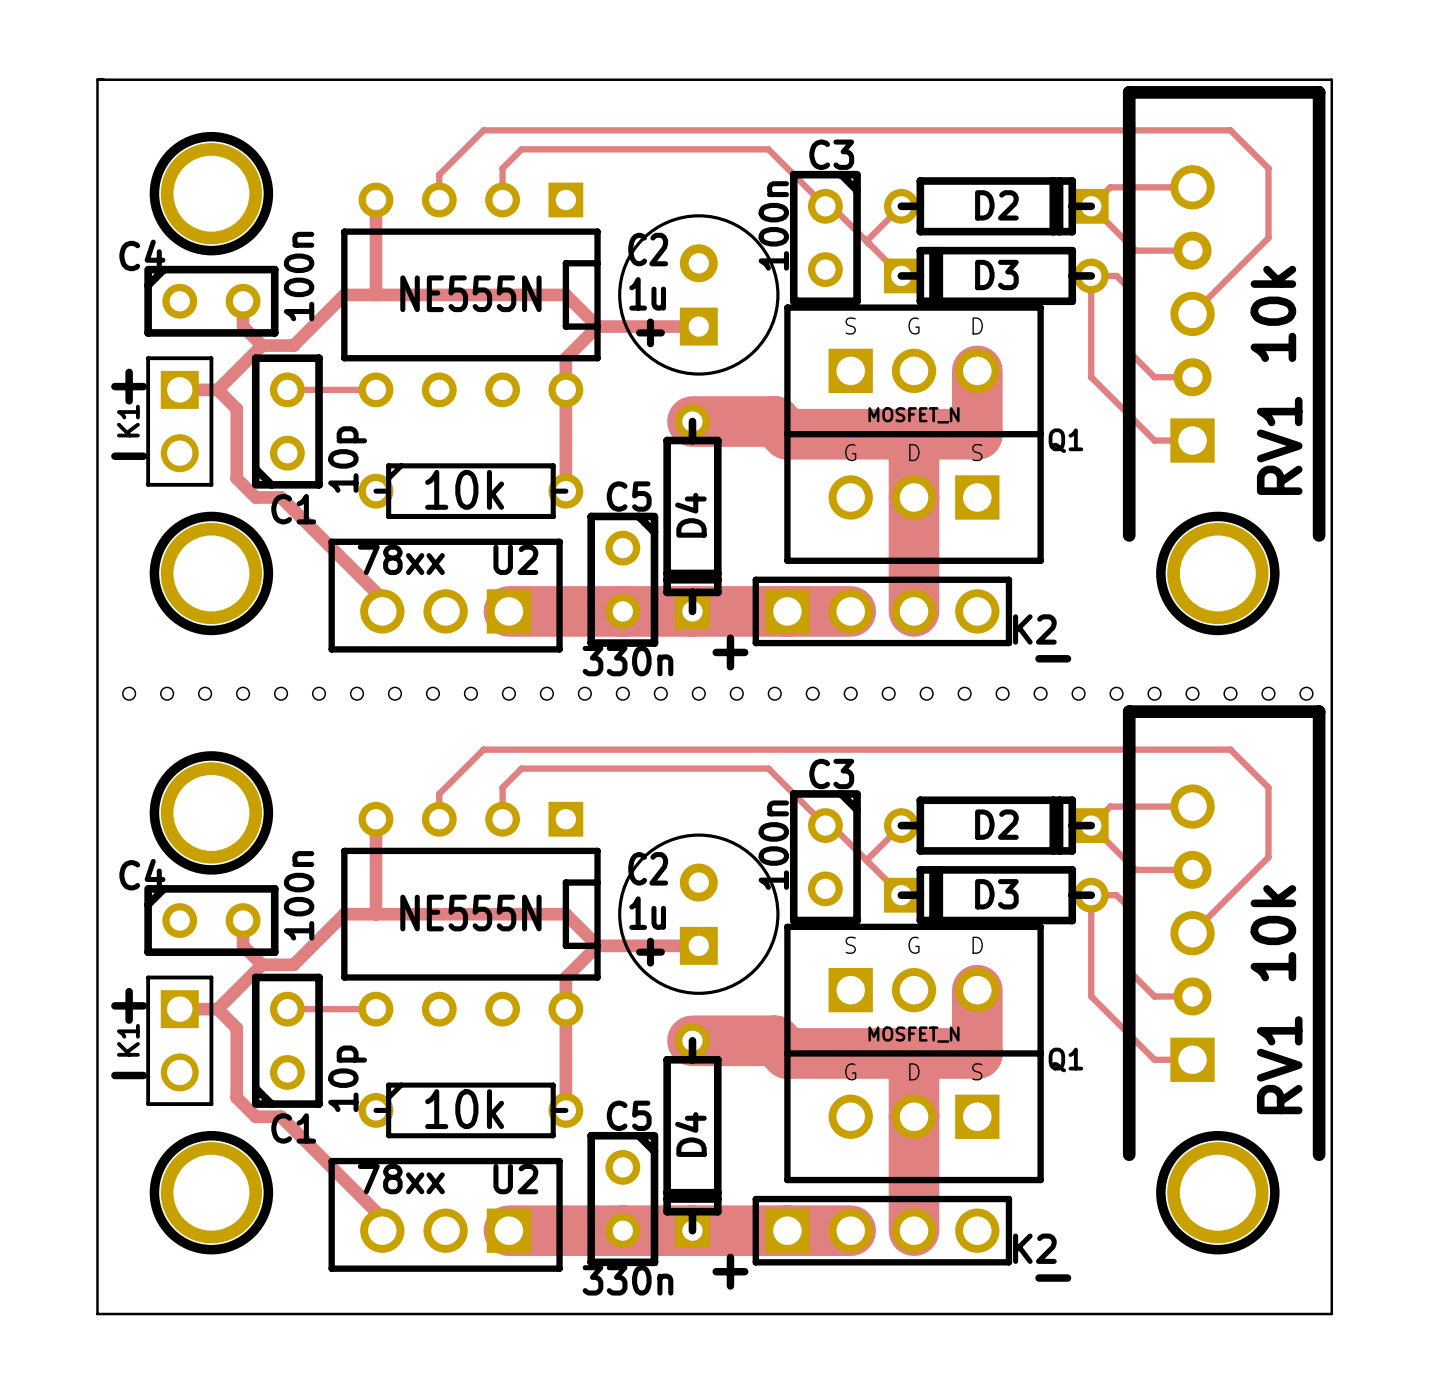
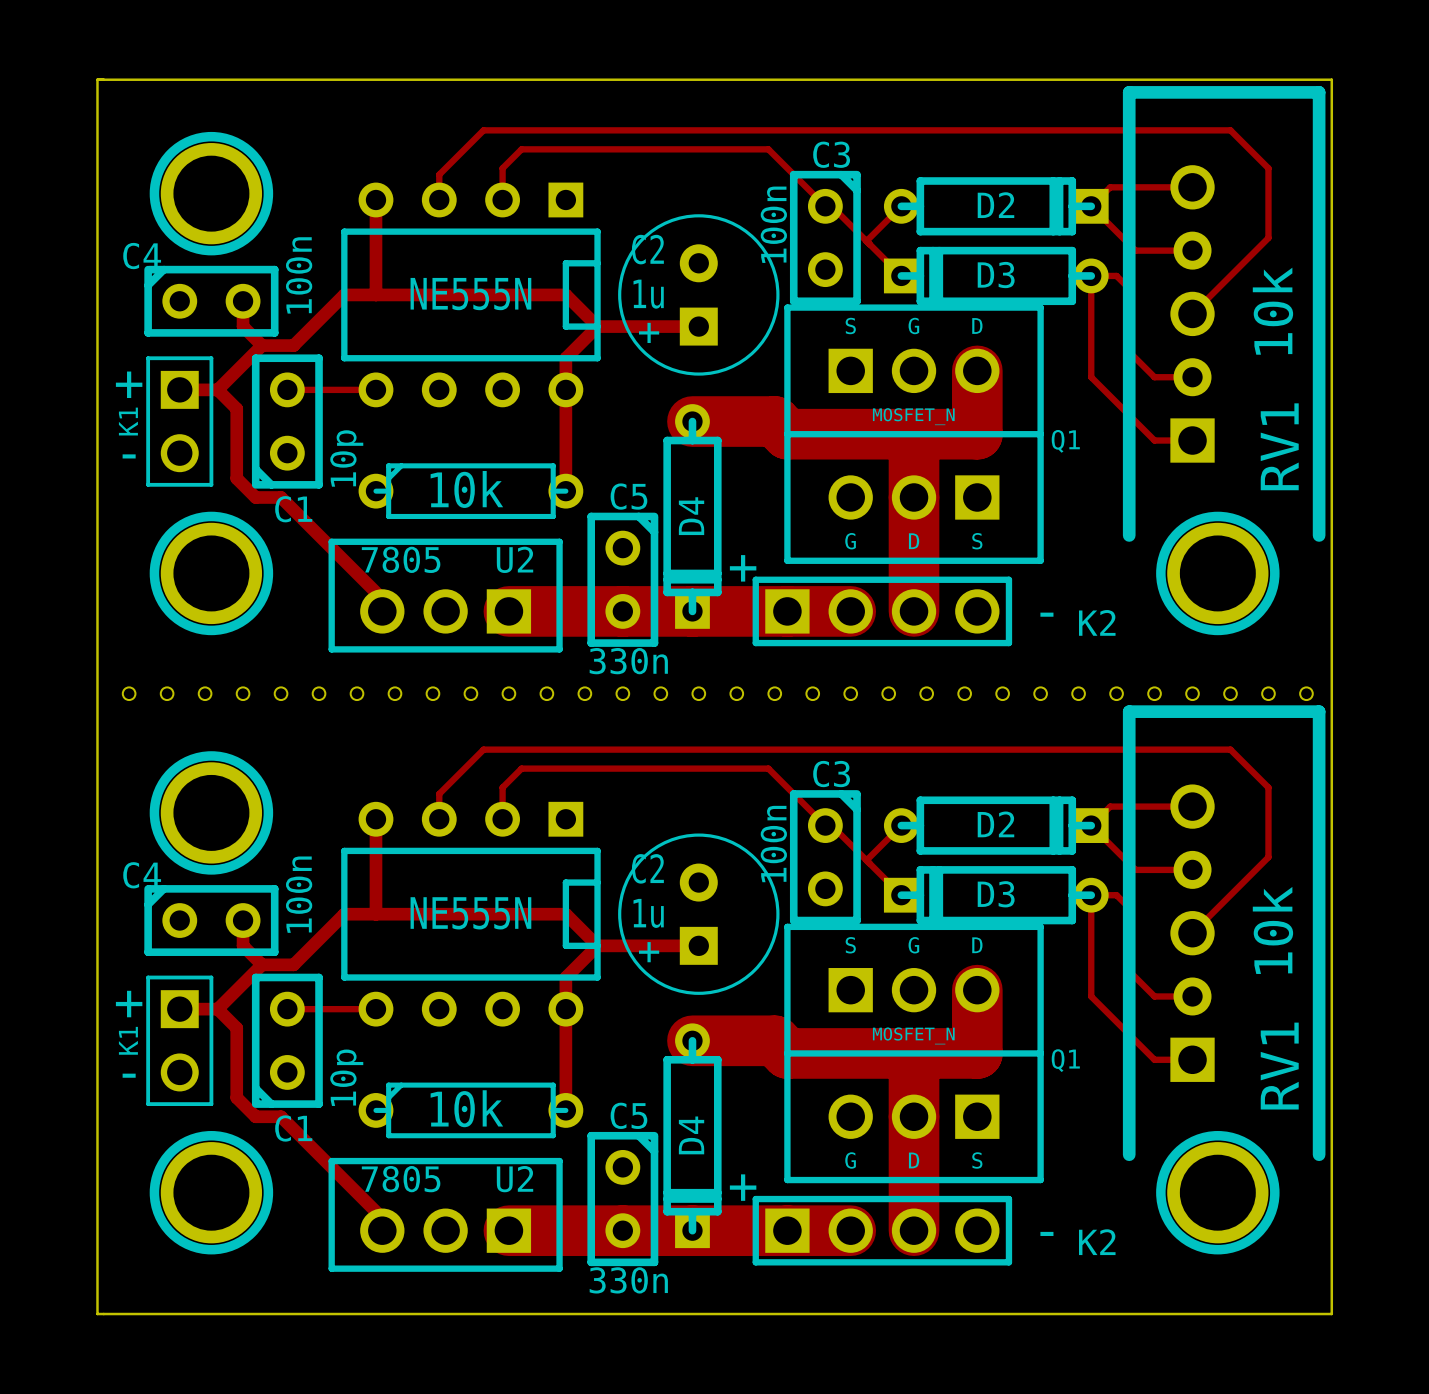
Q1 text position: G (850, 452) -> G (850, 541)
Q1 text position: D (914, 452) -> D (914, 541)
Q1 text position: S (977, 452) -> S (977, 541)
U2 value: 78xx (401, 559) -> 7805 (401, 559)
K2 name position: K2 (1034, 629) -> K2 (1097, 622)
text position: + (730, 652) -> + (743, 568)
text position: - (1053, 658) -> - (1046, 614)
Q1 text position: G (850, 1071) -> G (850, 1160)
Q1 text position: D (914, 1071) -> D (914, 1160)
Q1 text position: S (977, 1071) -> S (977, 1160)
U2 value: 78xx (401, 1179) -> 7805 (401, 1179)
K2 name position: K2 (1034, 1248) -> K2 (1097, 1242)
text position: + (730, 1271) -> + (743, 1187)
text position: - (1053, 1278) -> - (1046, 1233)

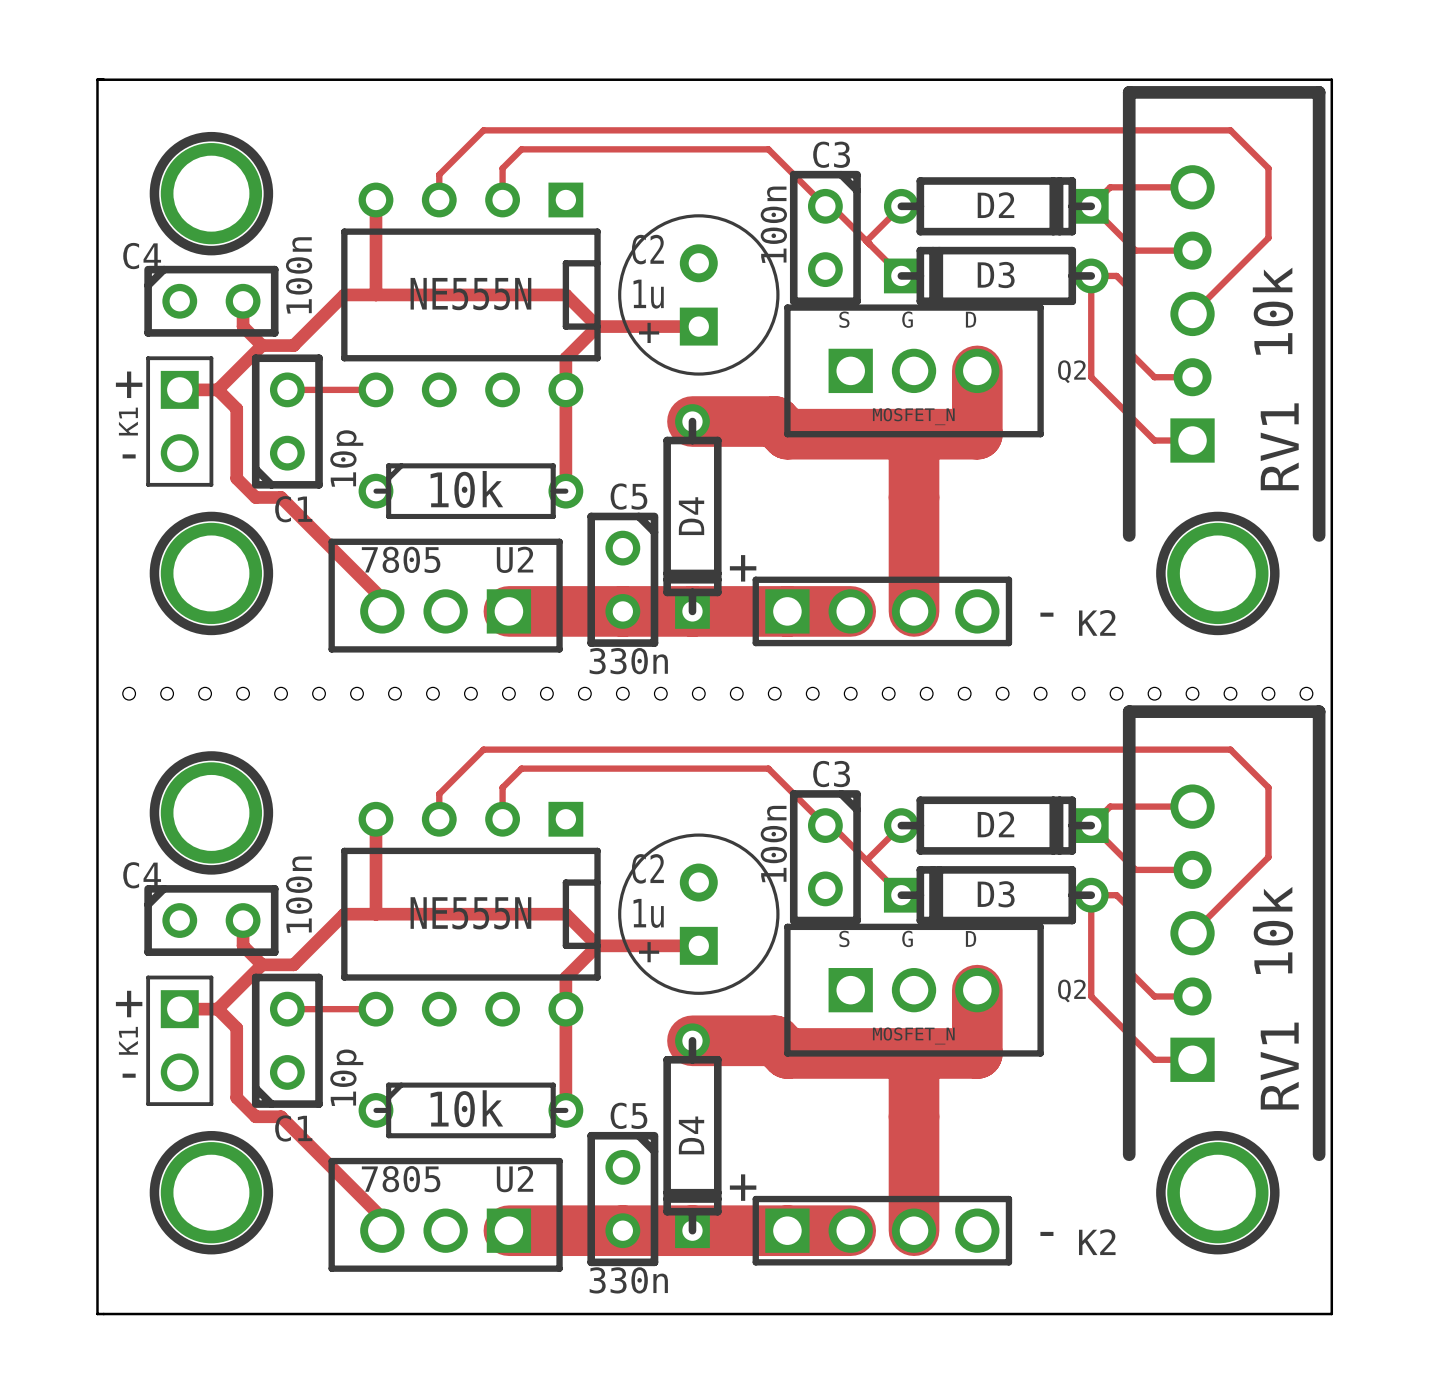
Q2: none -> MOSFET_N (914, 370)
Q1: MOSFET_N (914, 434) -> none
Q2: none -> MOSFET_N (914, 990)
Q1: MOSFET_N (914, 1053) -> none

